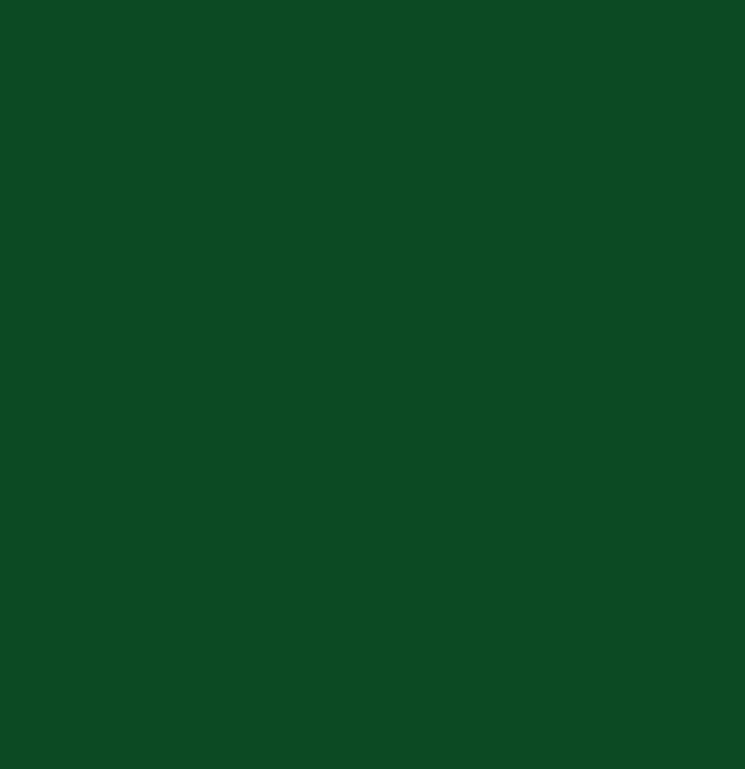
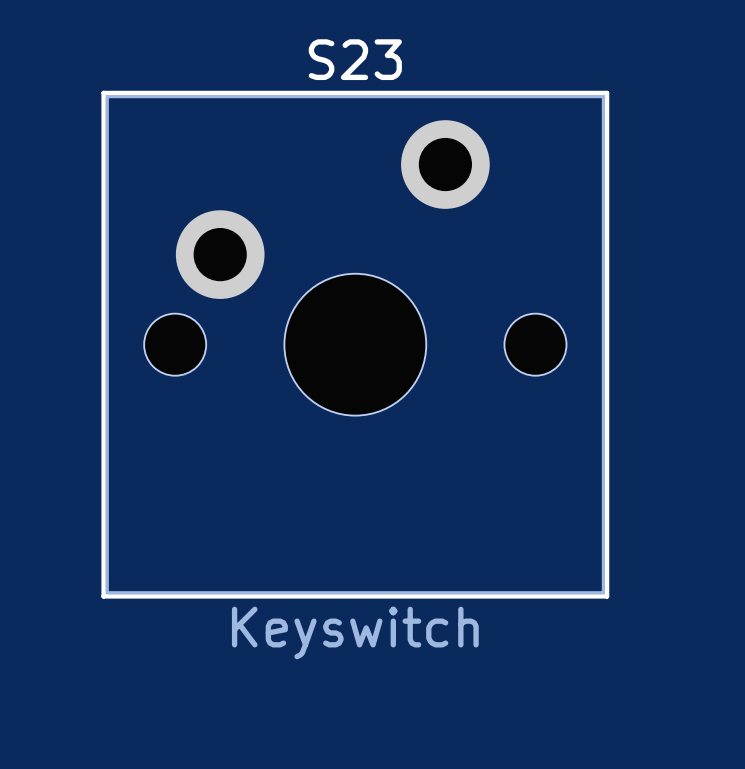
S23: none -> Keyswitch (355, 344)

